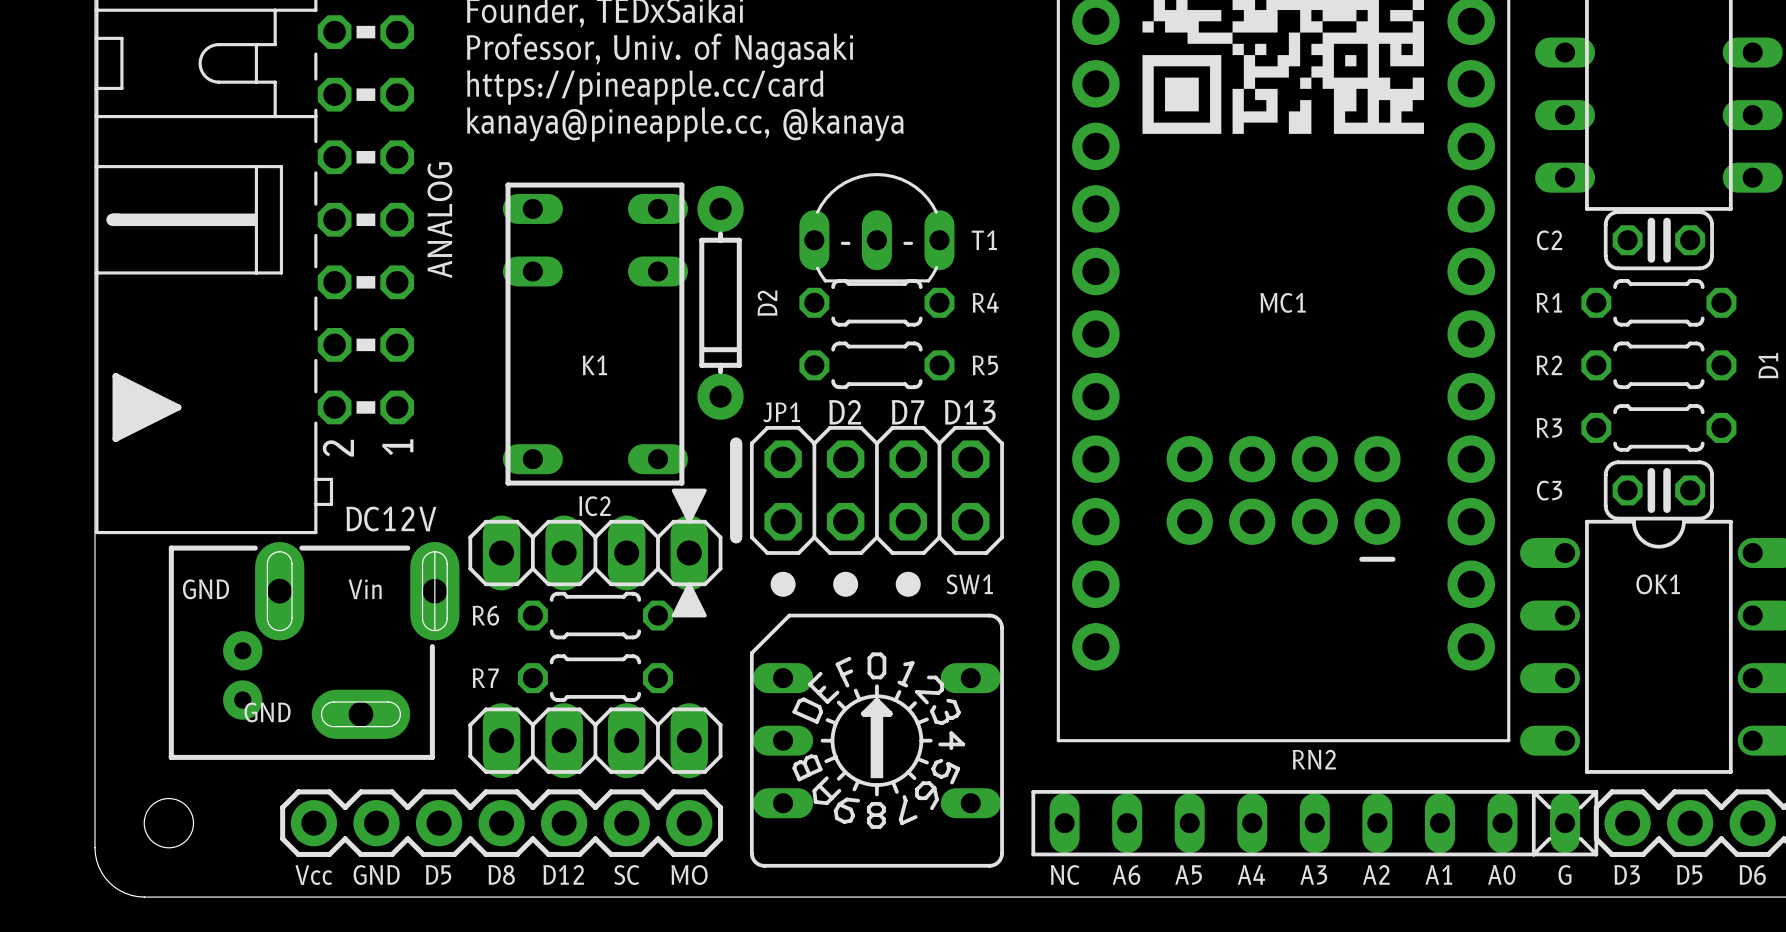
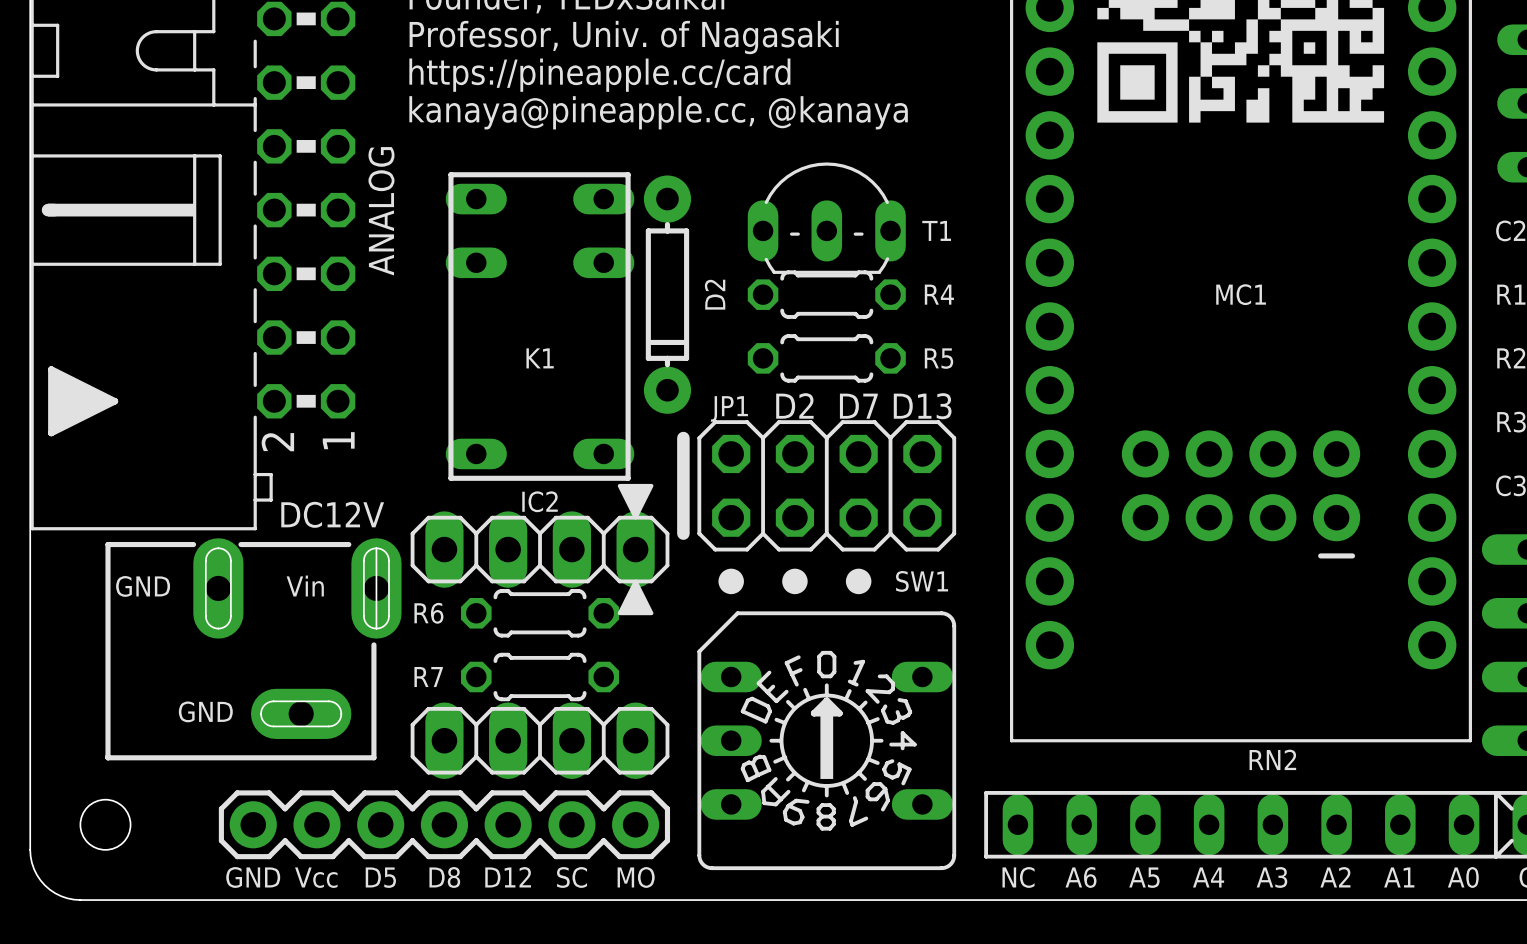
part: (242, 675) -> none
text: Vcc (313, 875) -> GND (253, 877)
text: GND (376, 875) -> Vcc (316, 877)

